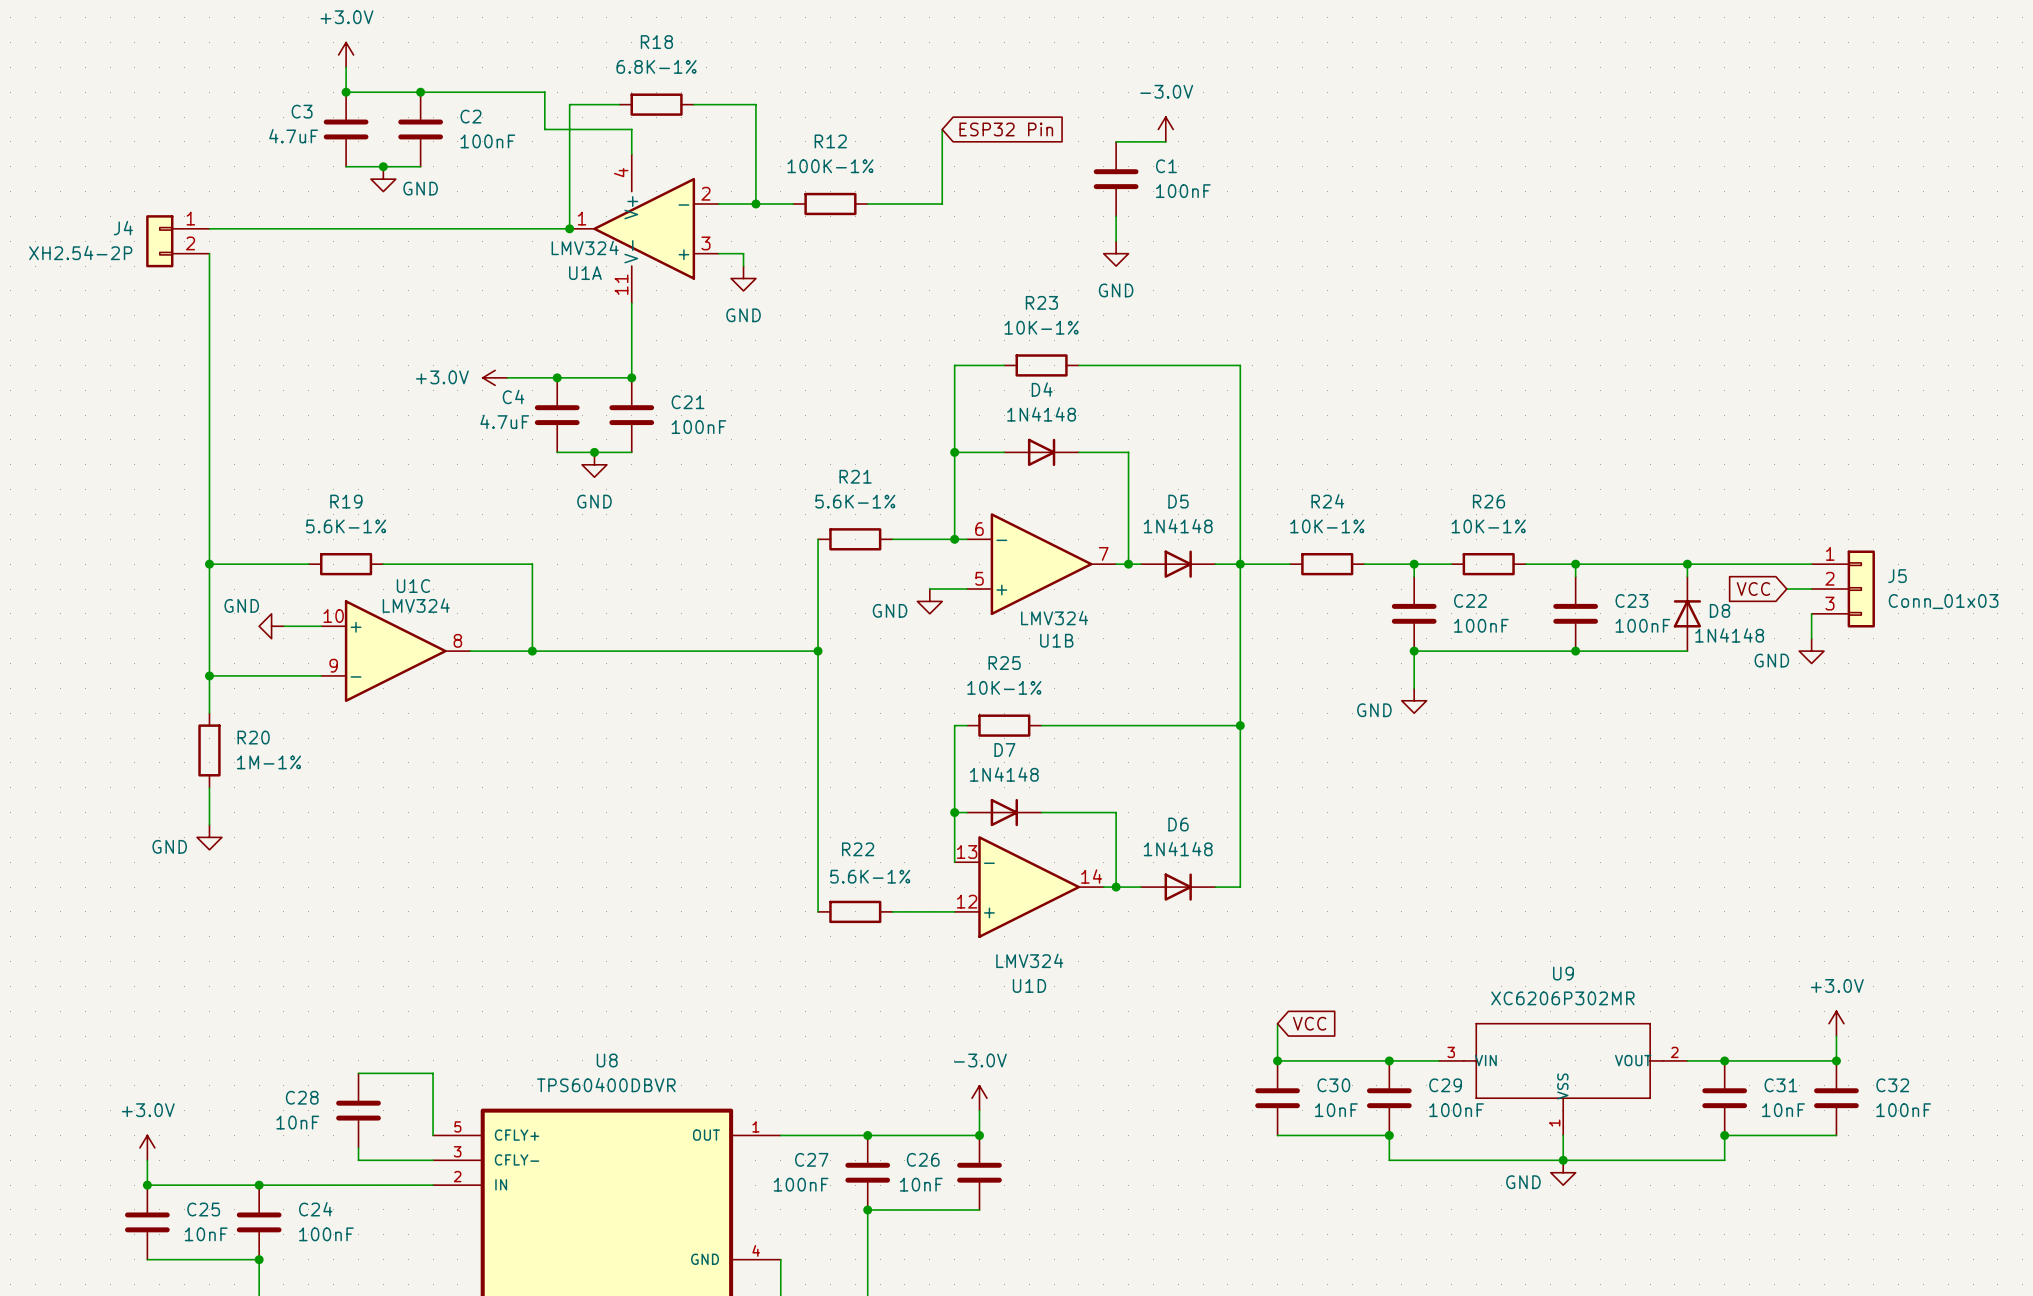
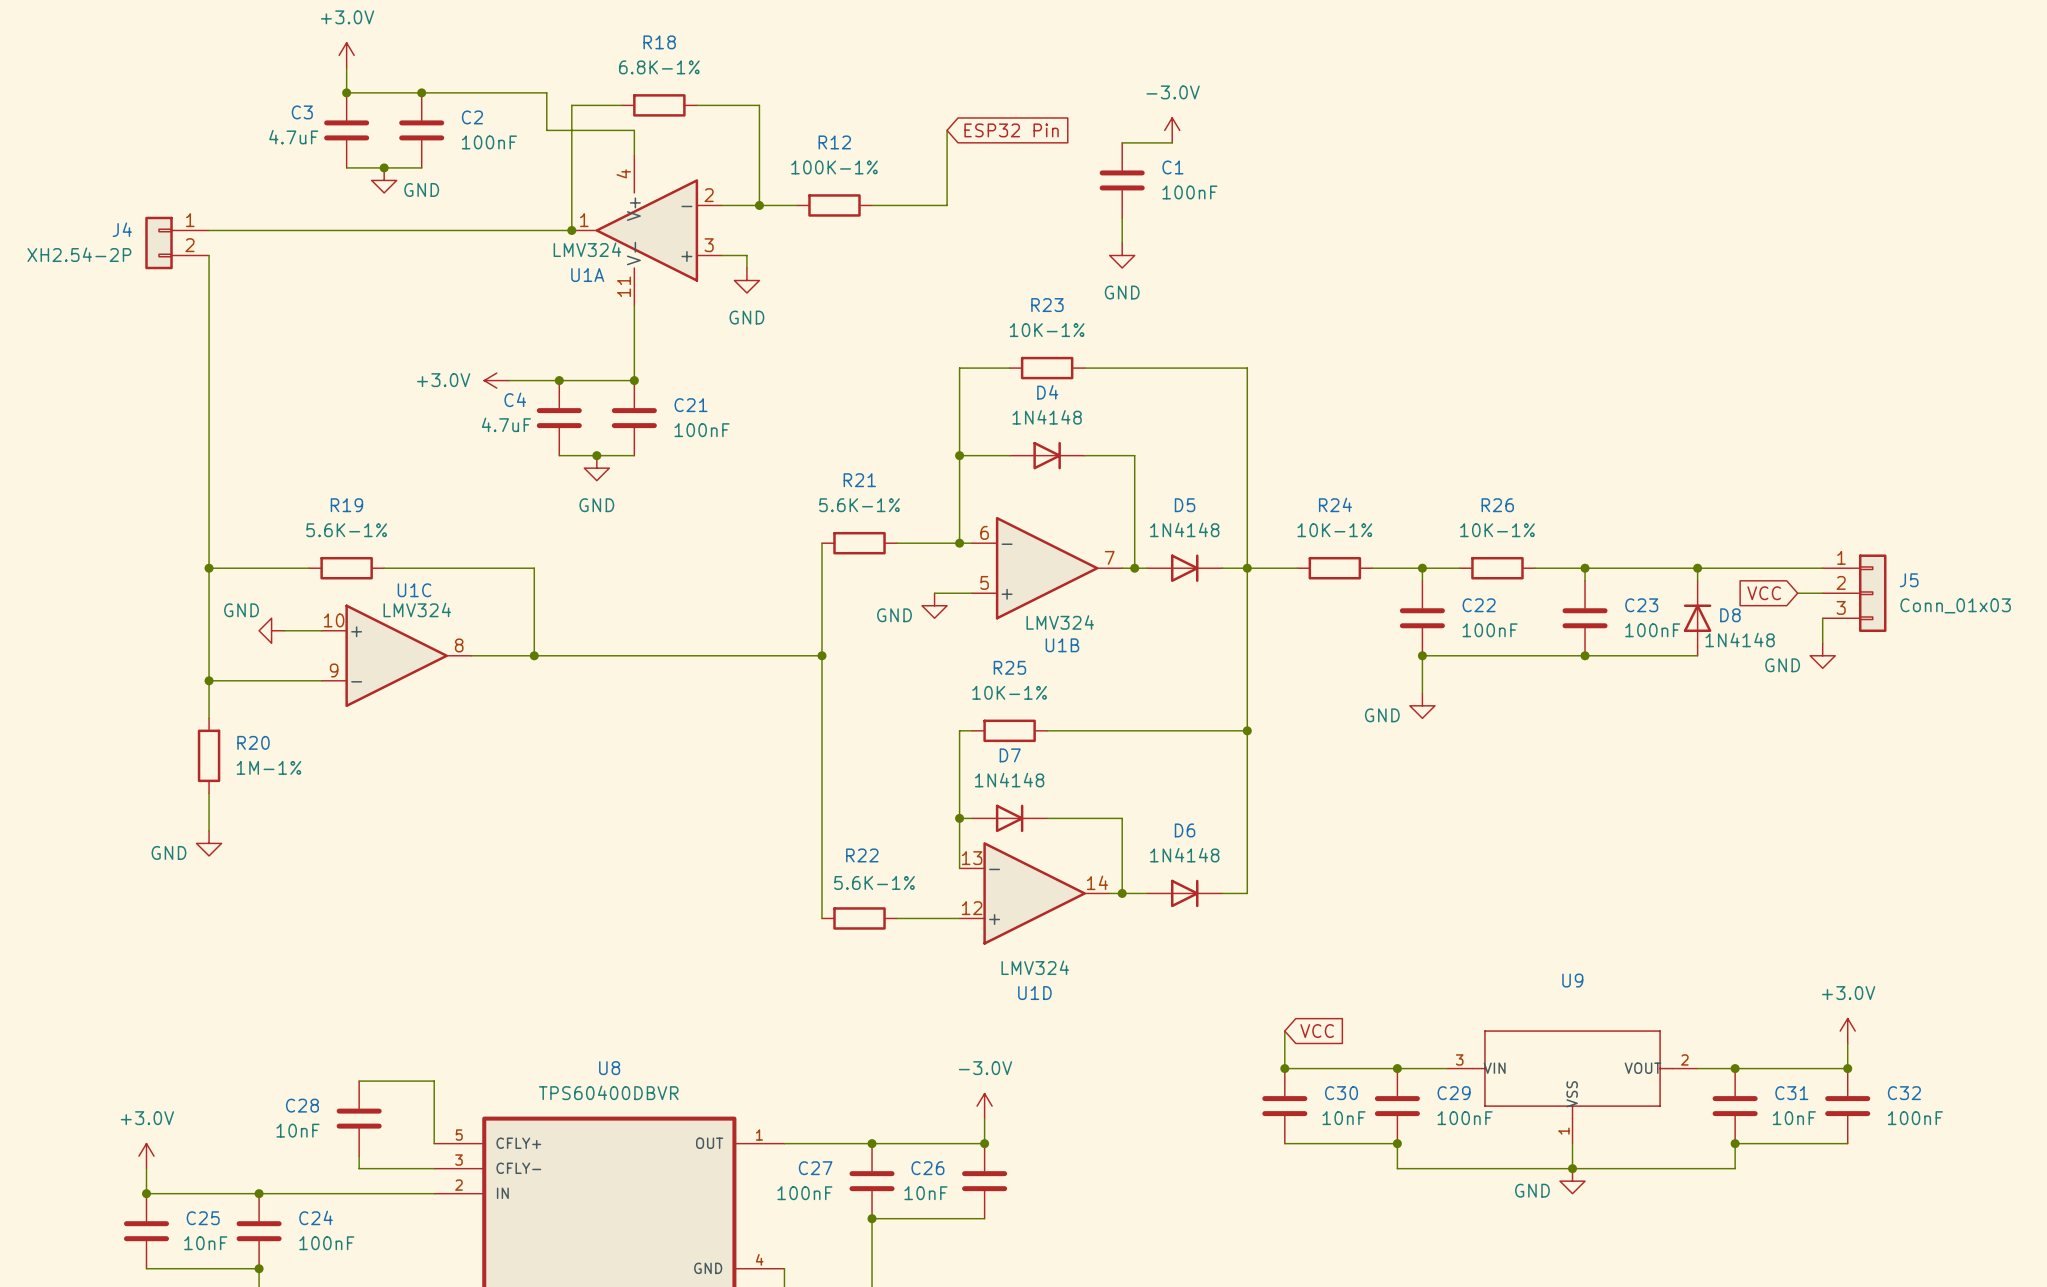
U9 value: XC6206P302MR (1562, 998) -> none

